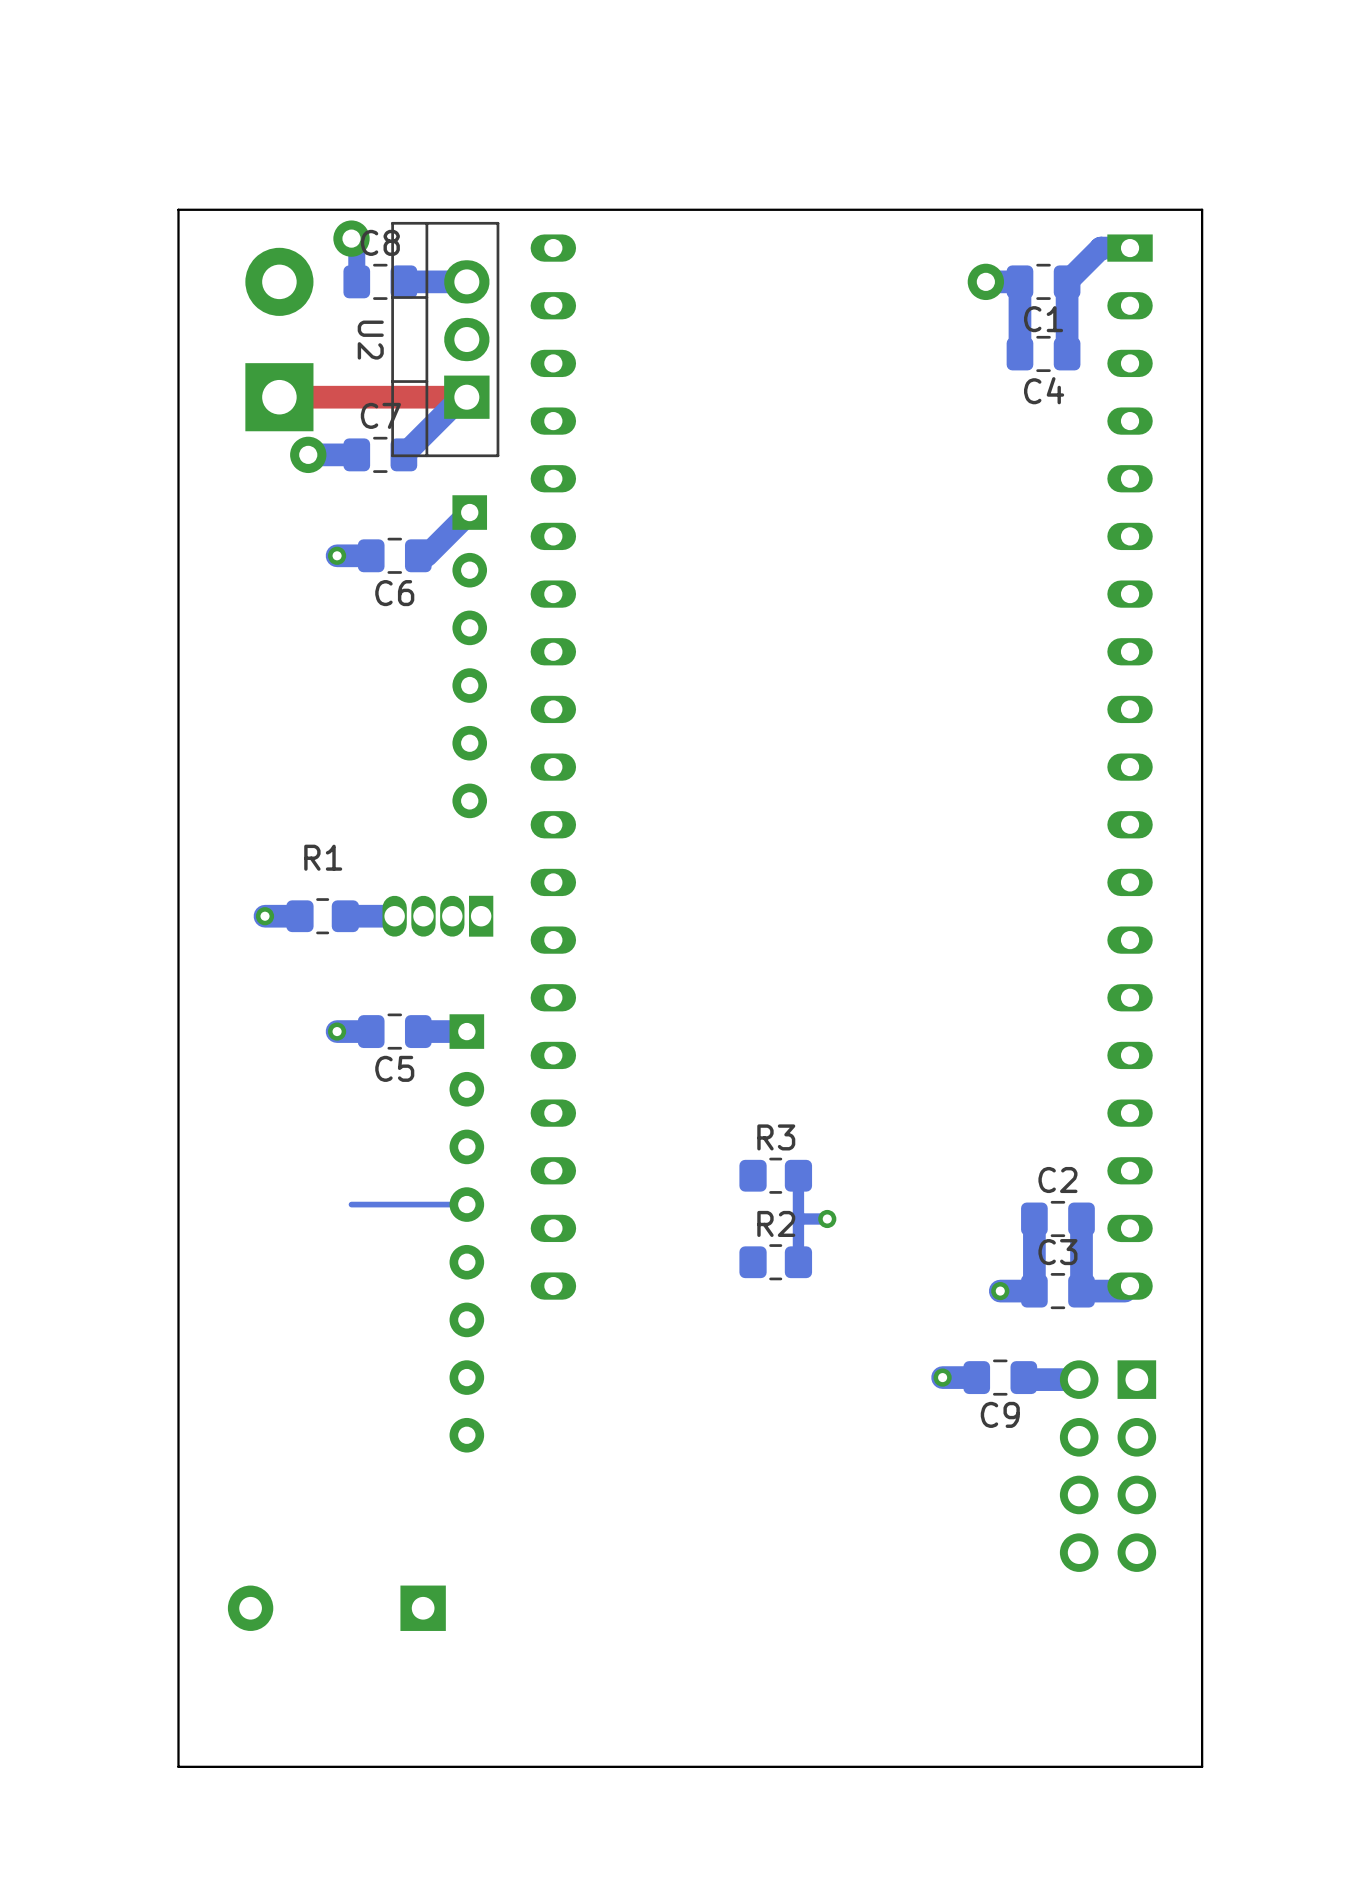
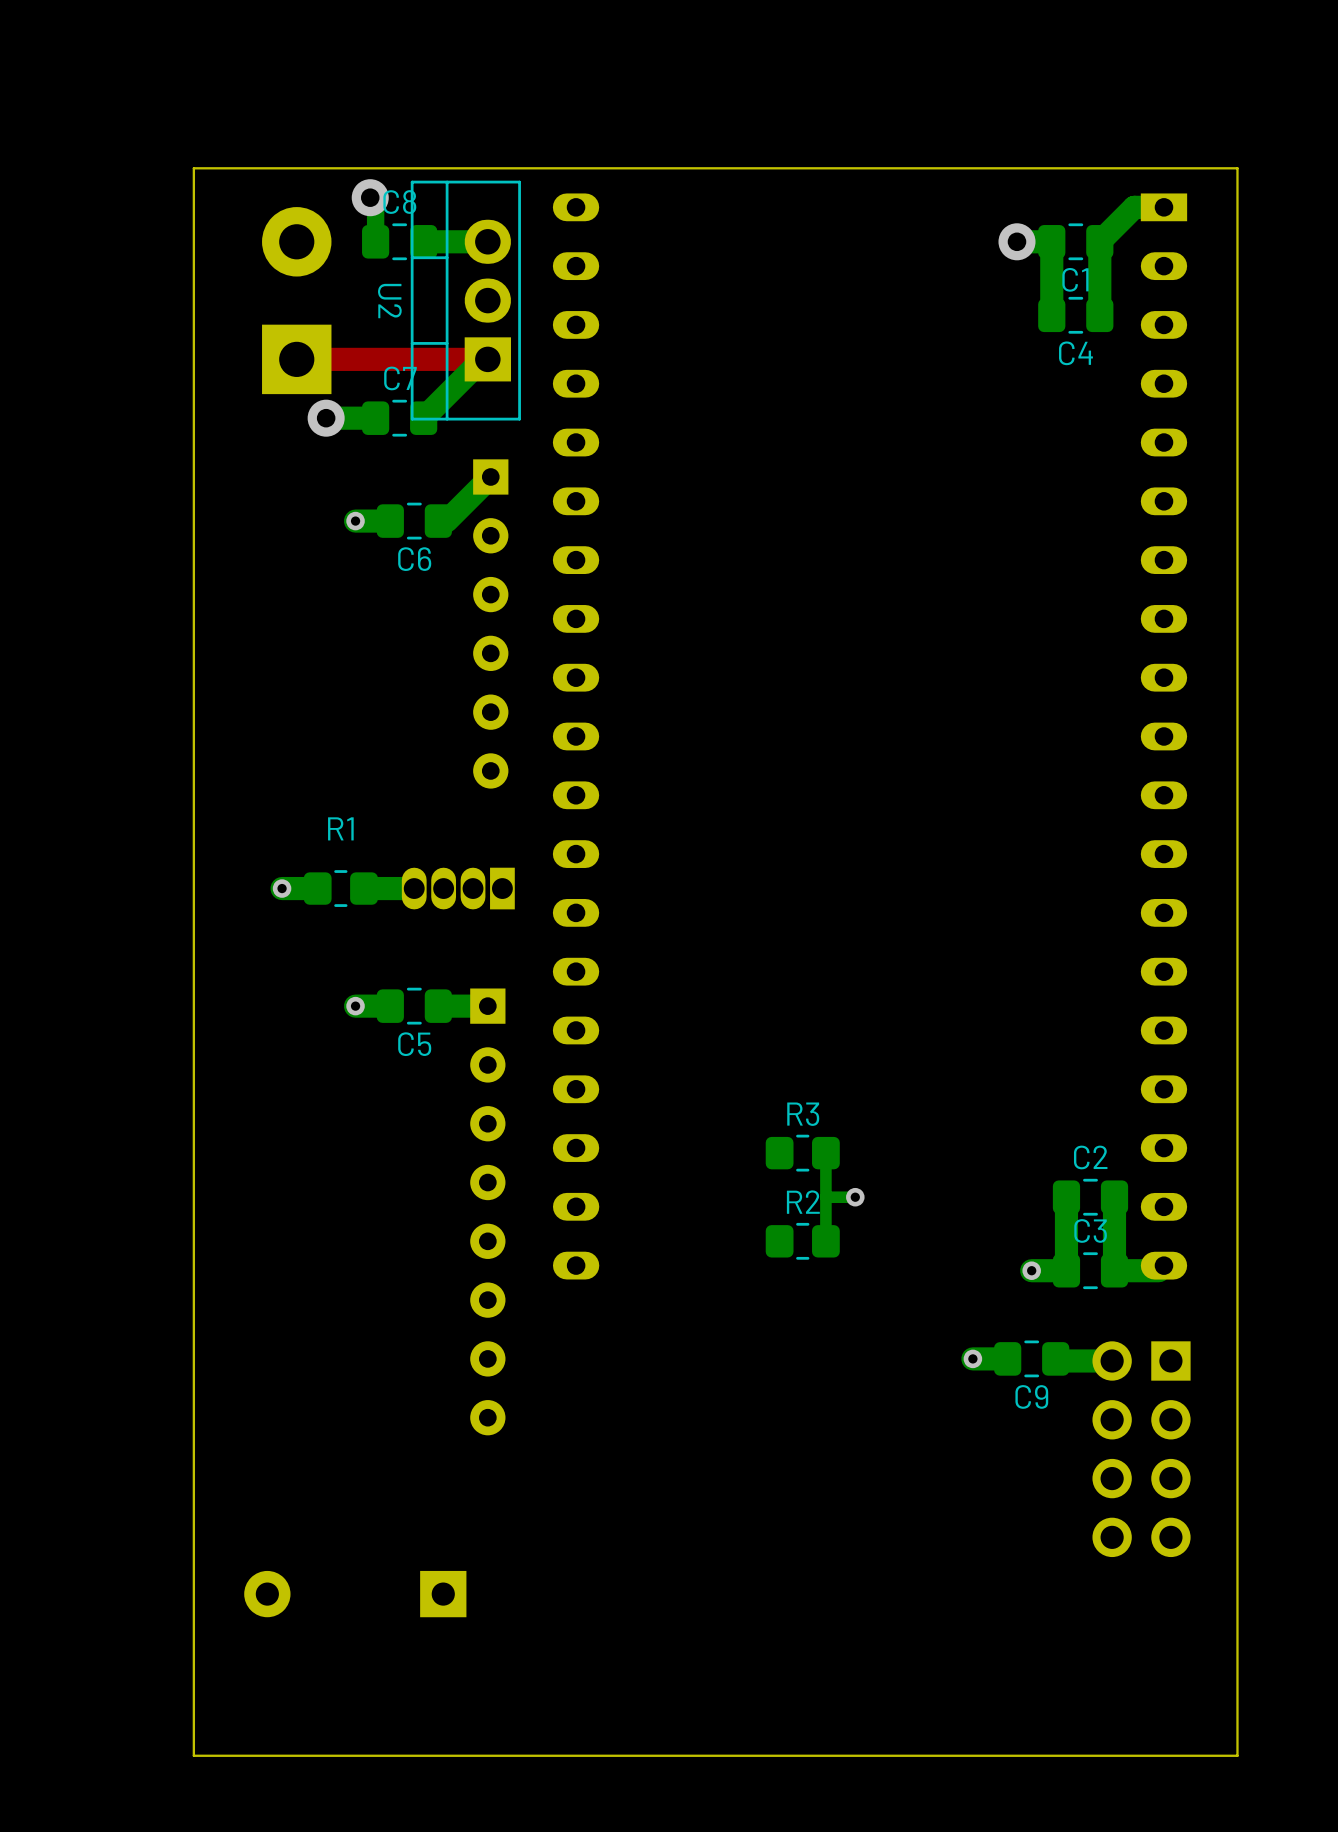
bottom track: (466, 1204) (351, 1204) -> none

